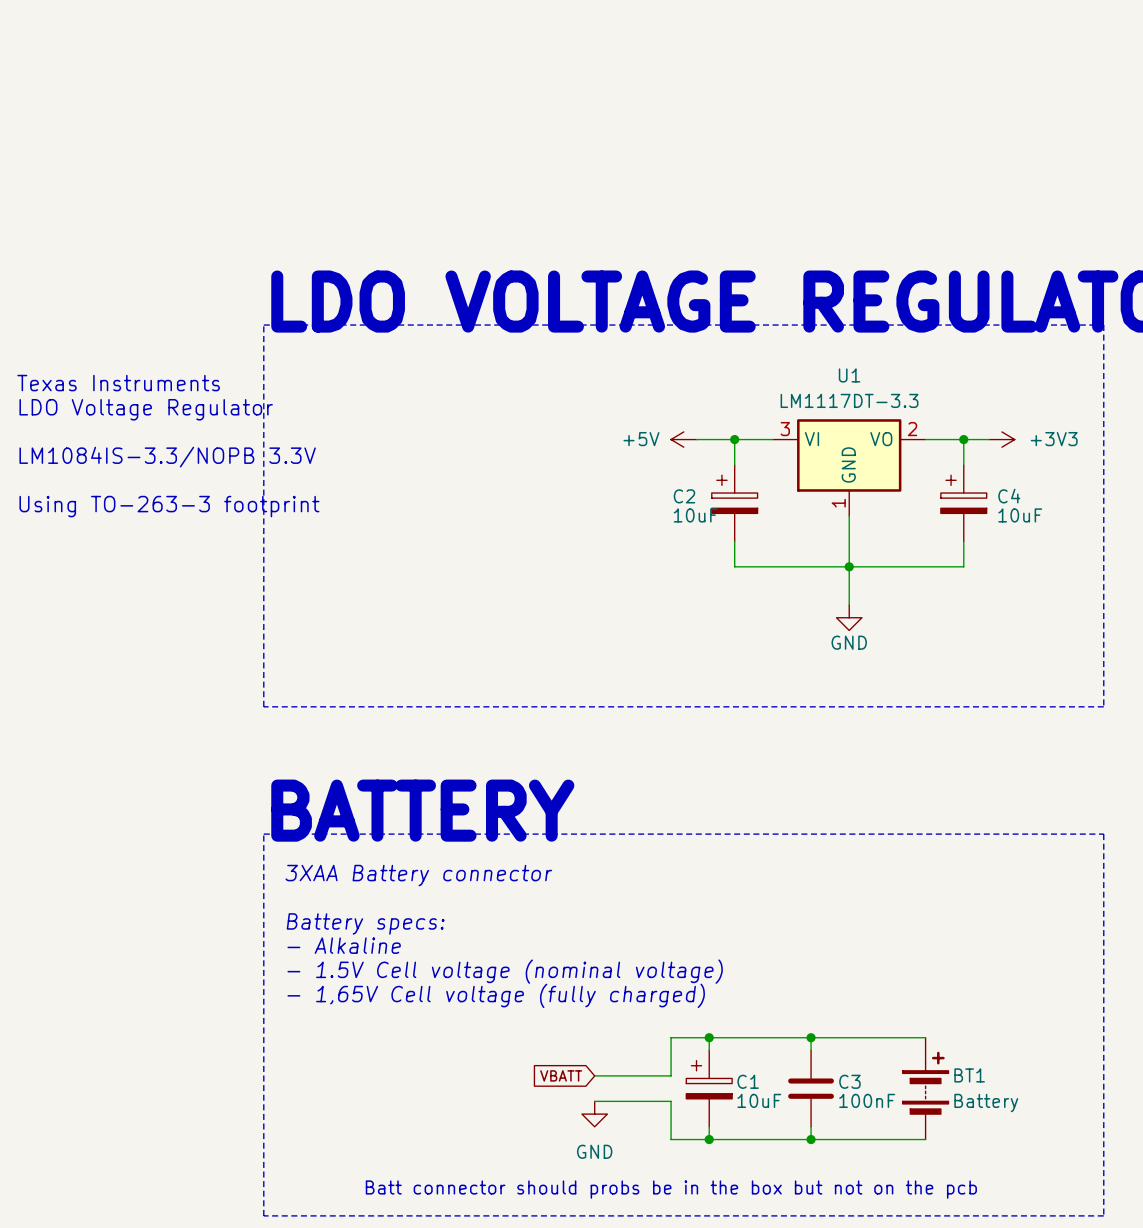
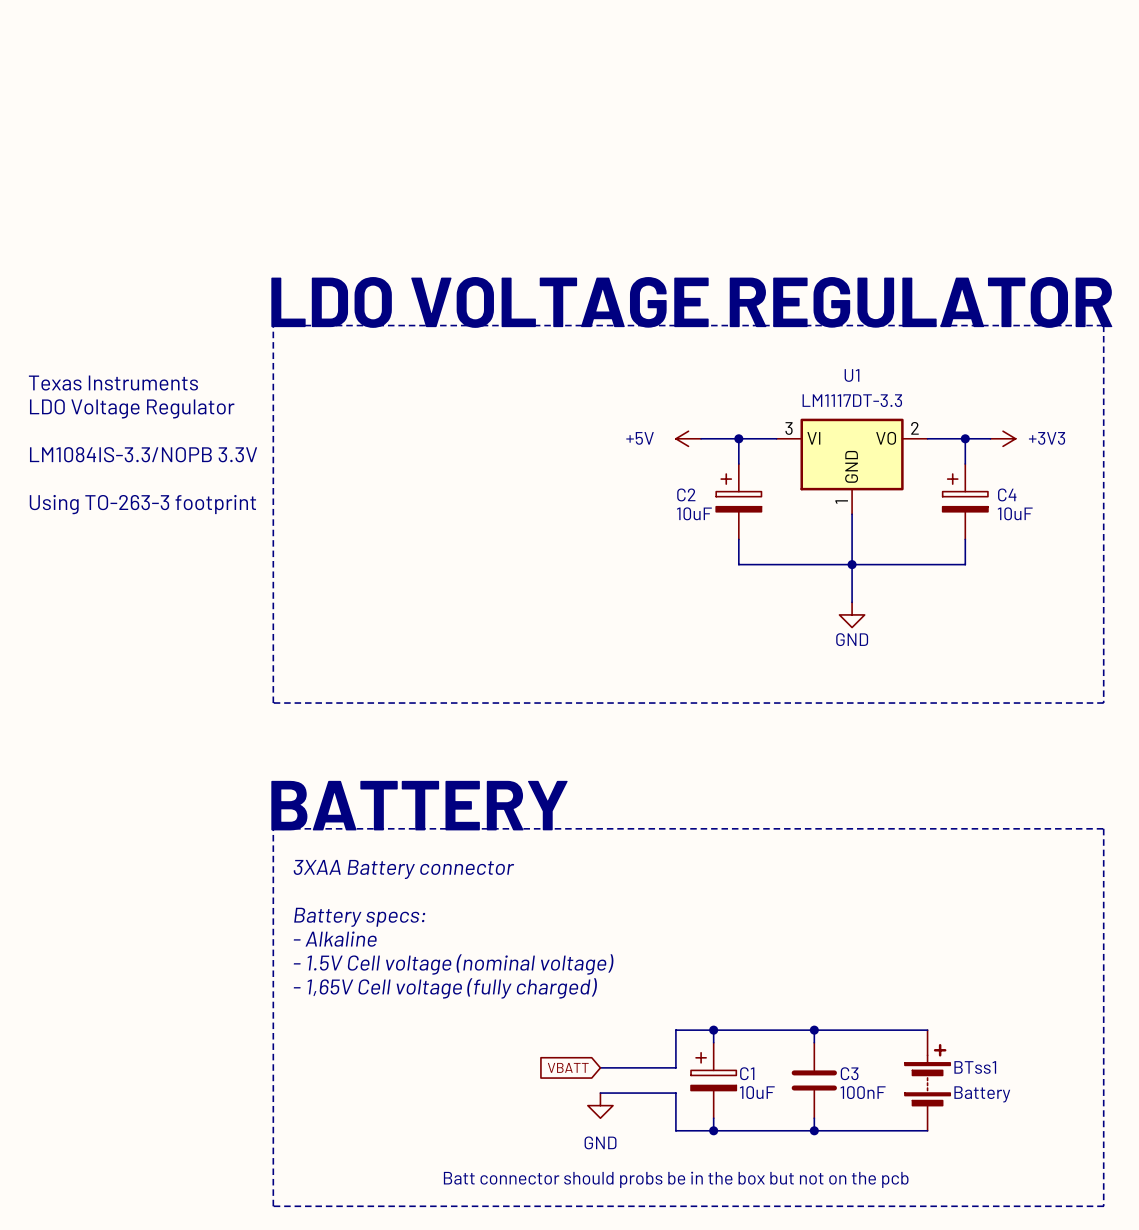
BT1 name: BT1 (969, 1075) -> BTss1 (975, 1067)

